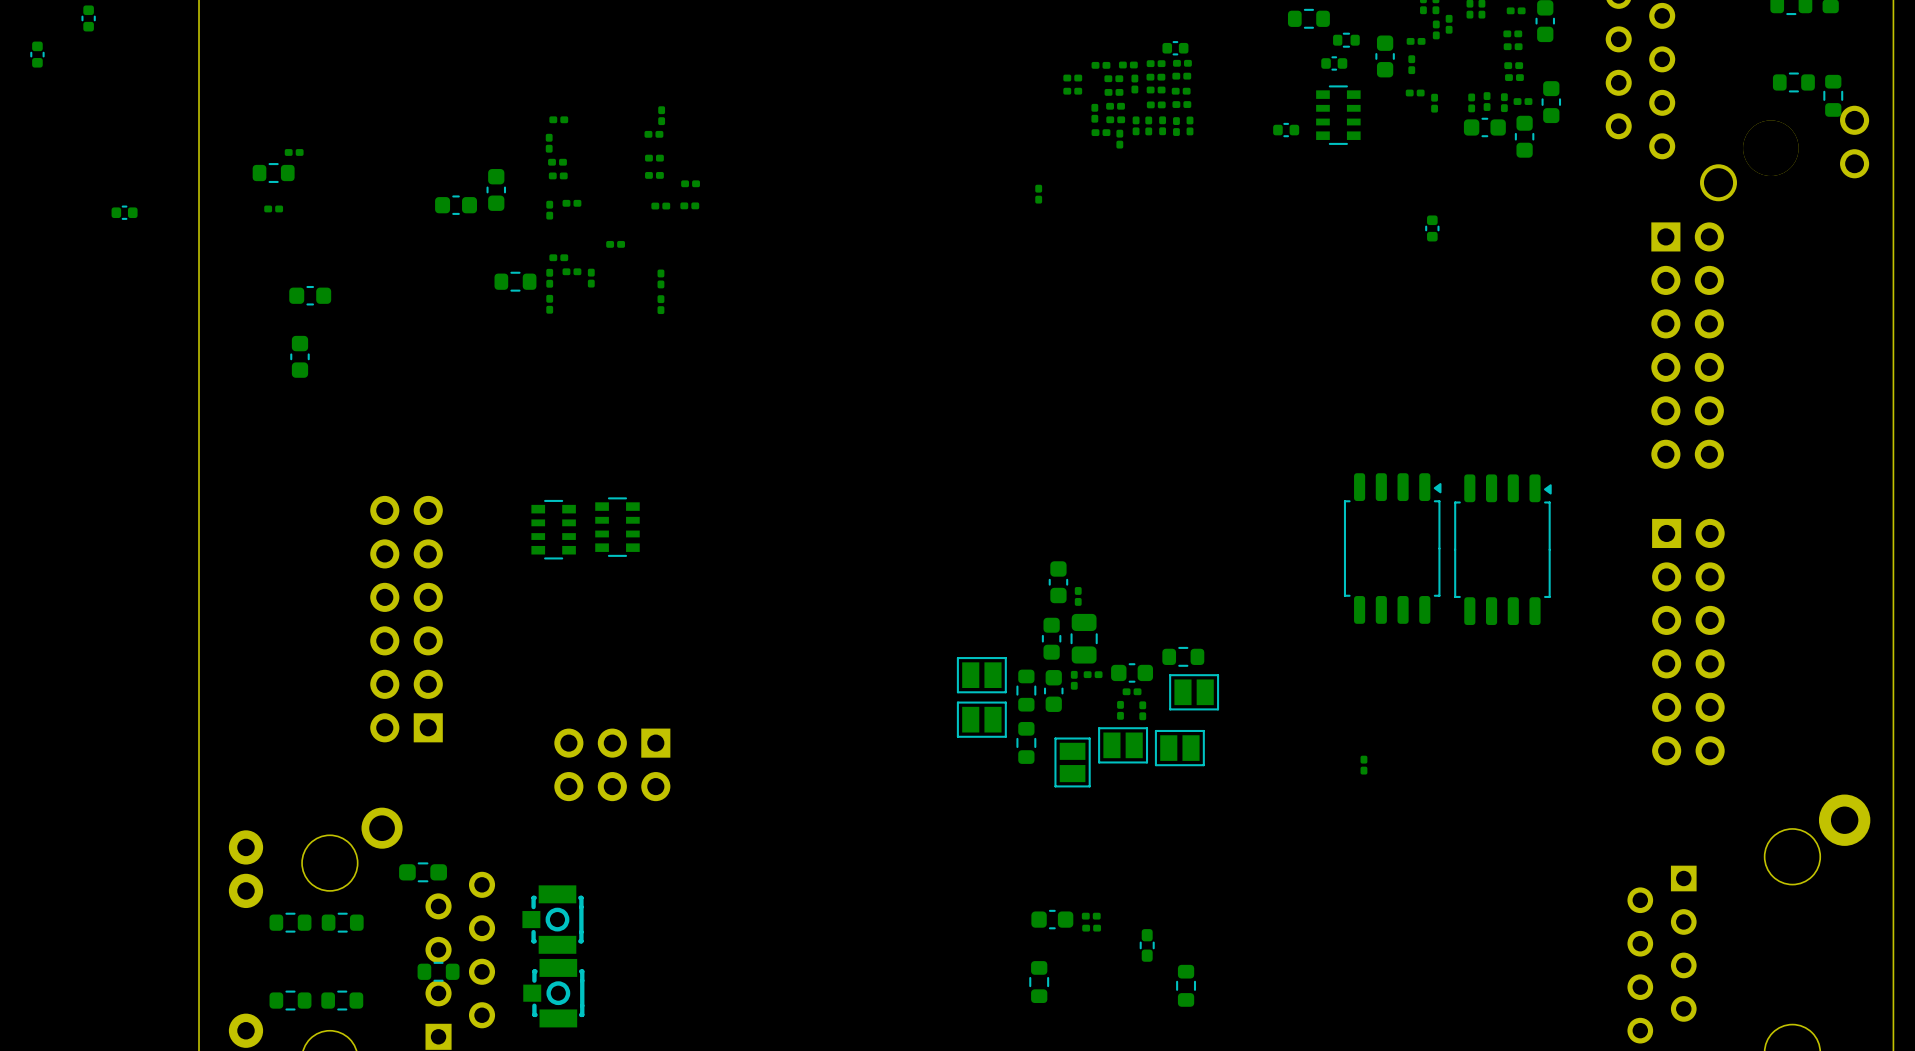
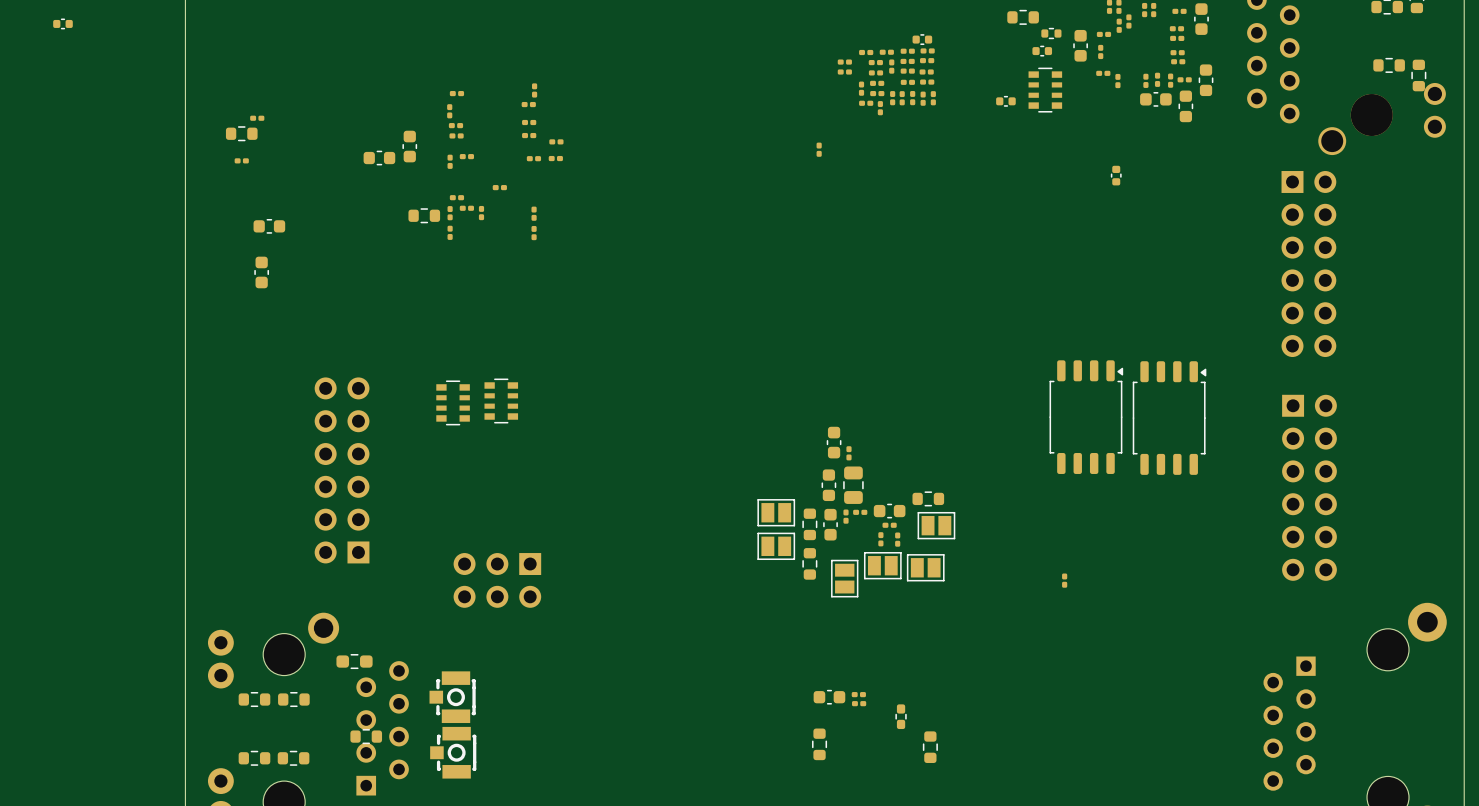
part: (88, 18) -> none
part: none -> (62, 23)
part: (37, 54) -> none
part: (124, 212) -> none

